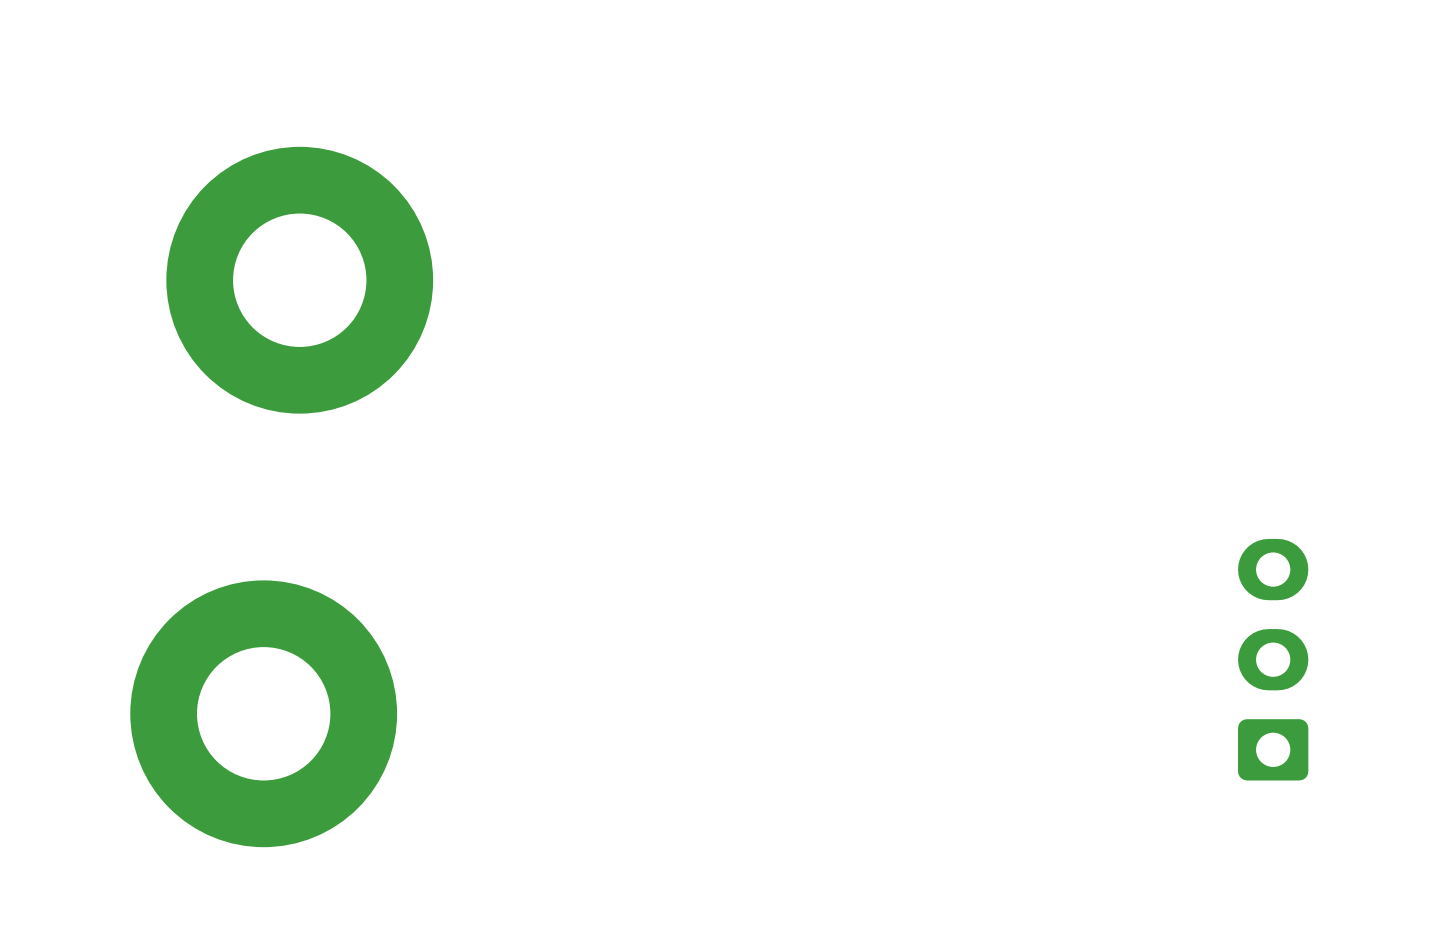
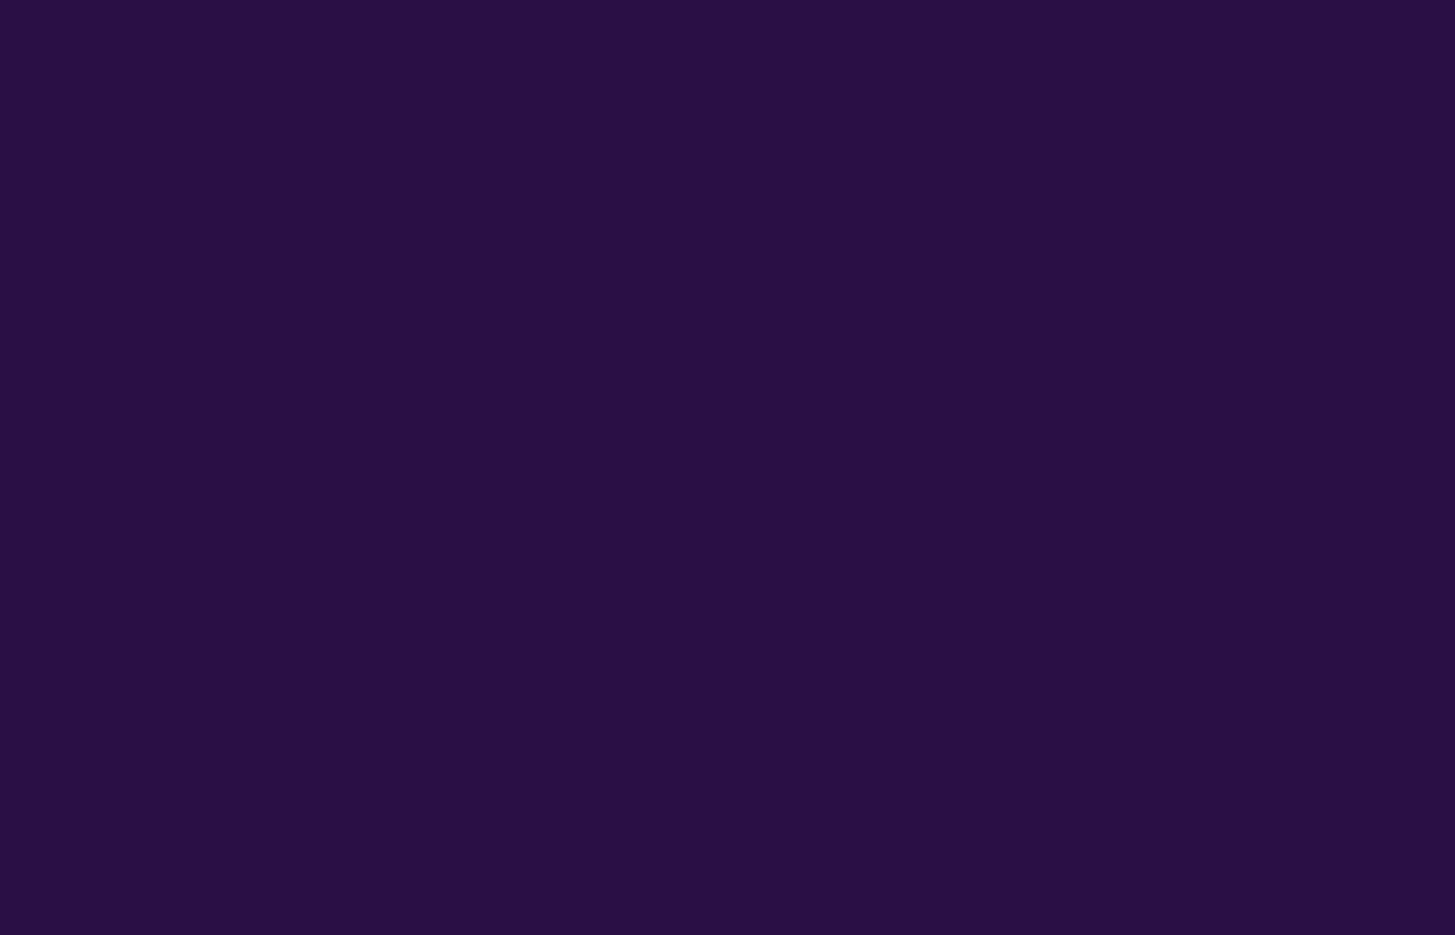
part: (299, 280) -> none
part: (1273, 659) -> none
part: (263, 713) -> none

